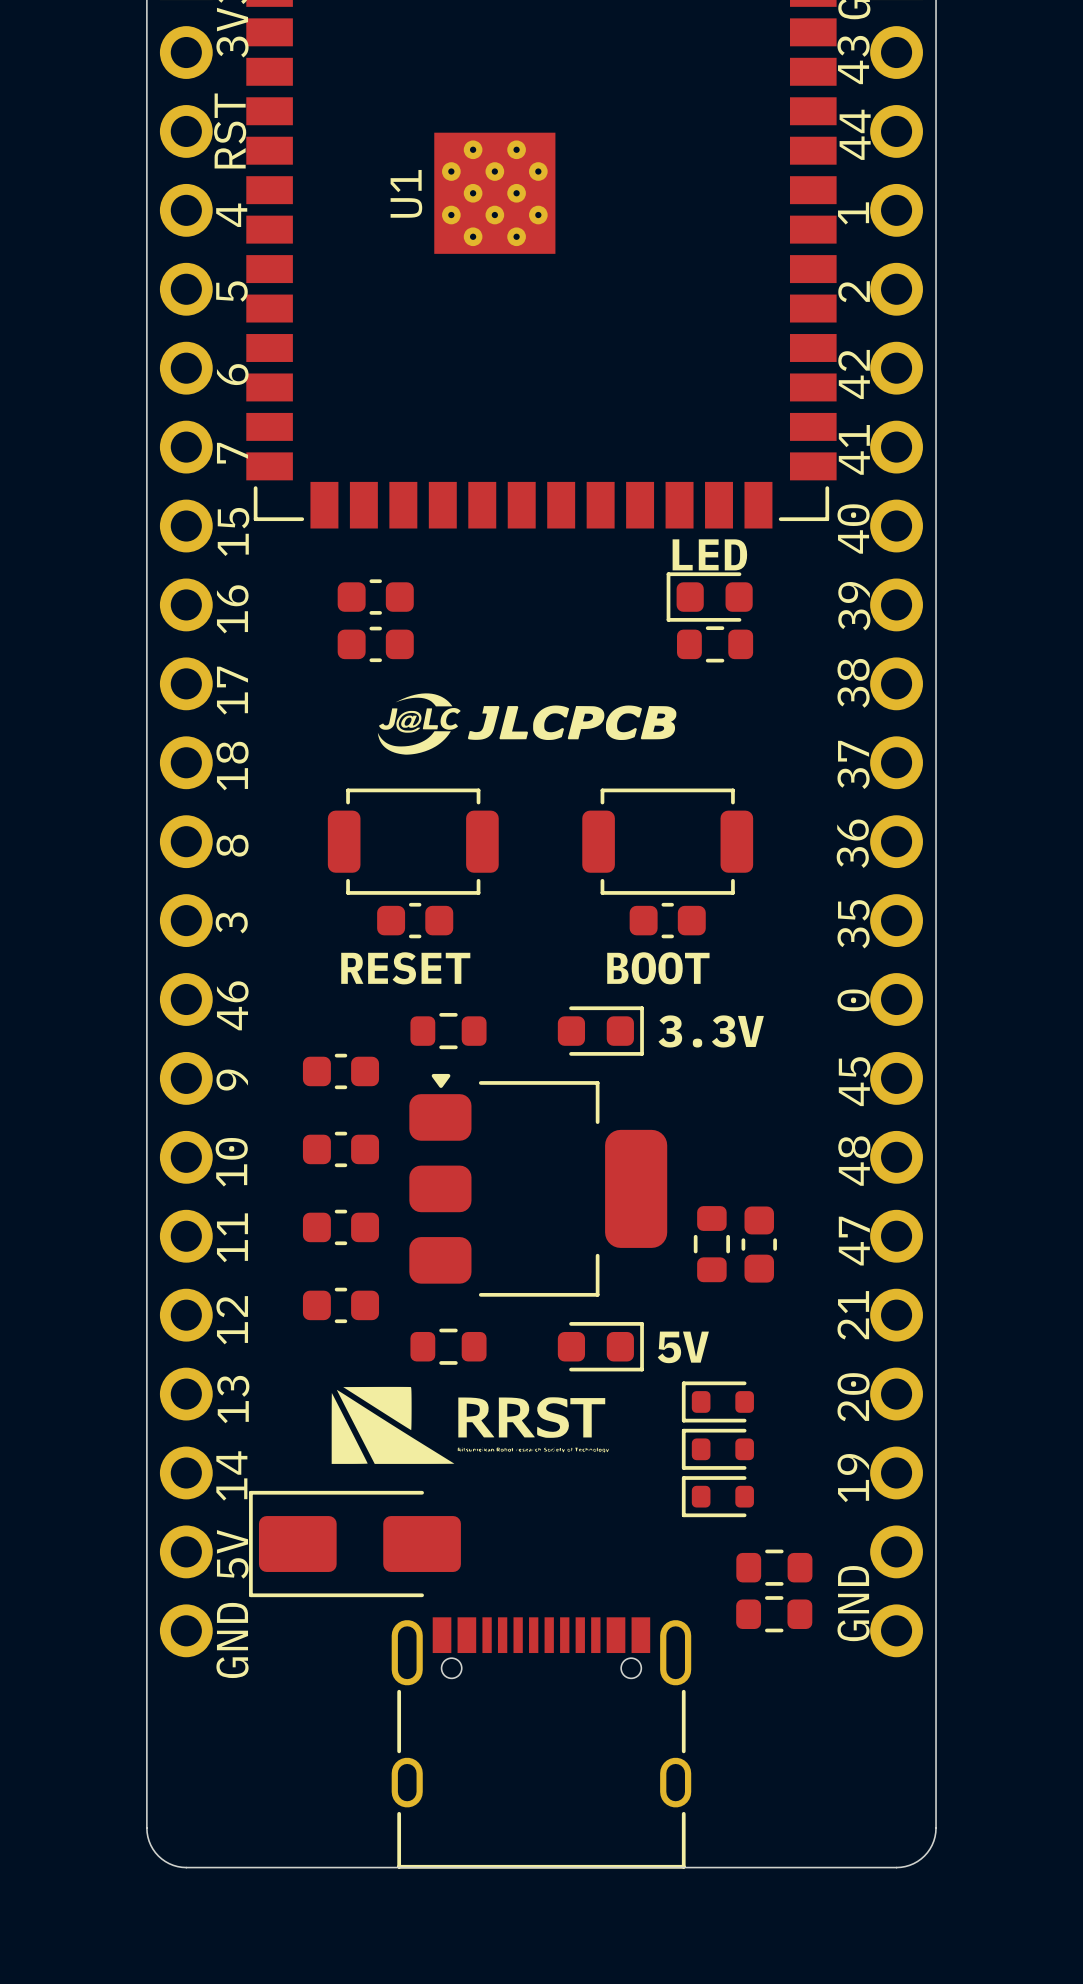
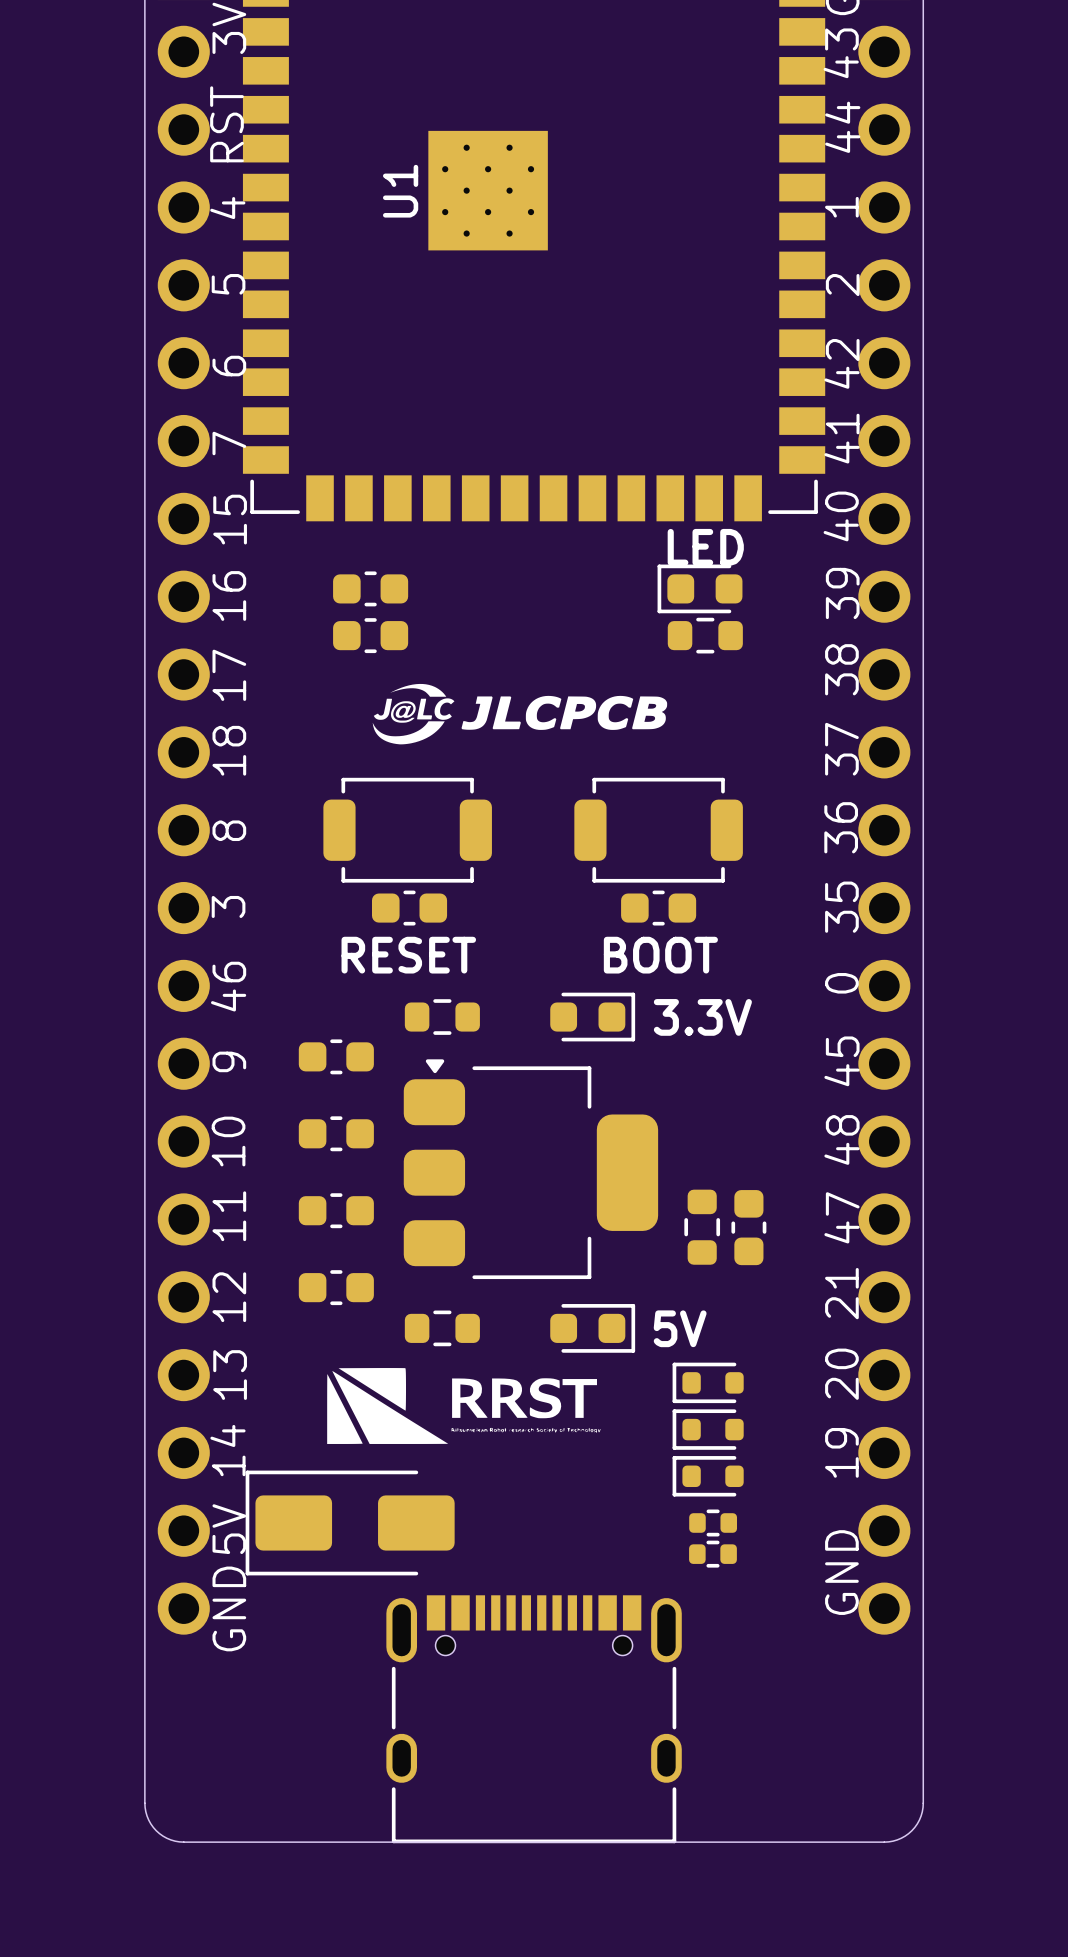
part: none -> (713, 1522)
part: (774, 1567) -> none
part: none -> (712, 1554)
part: (774, 1614) -> none

